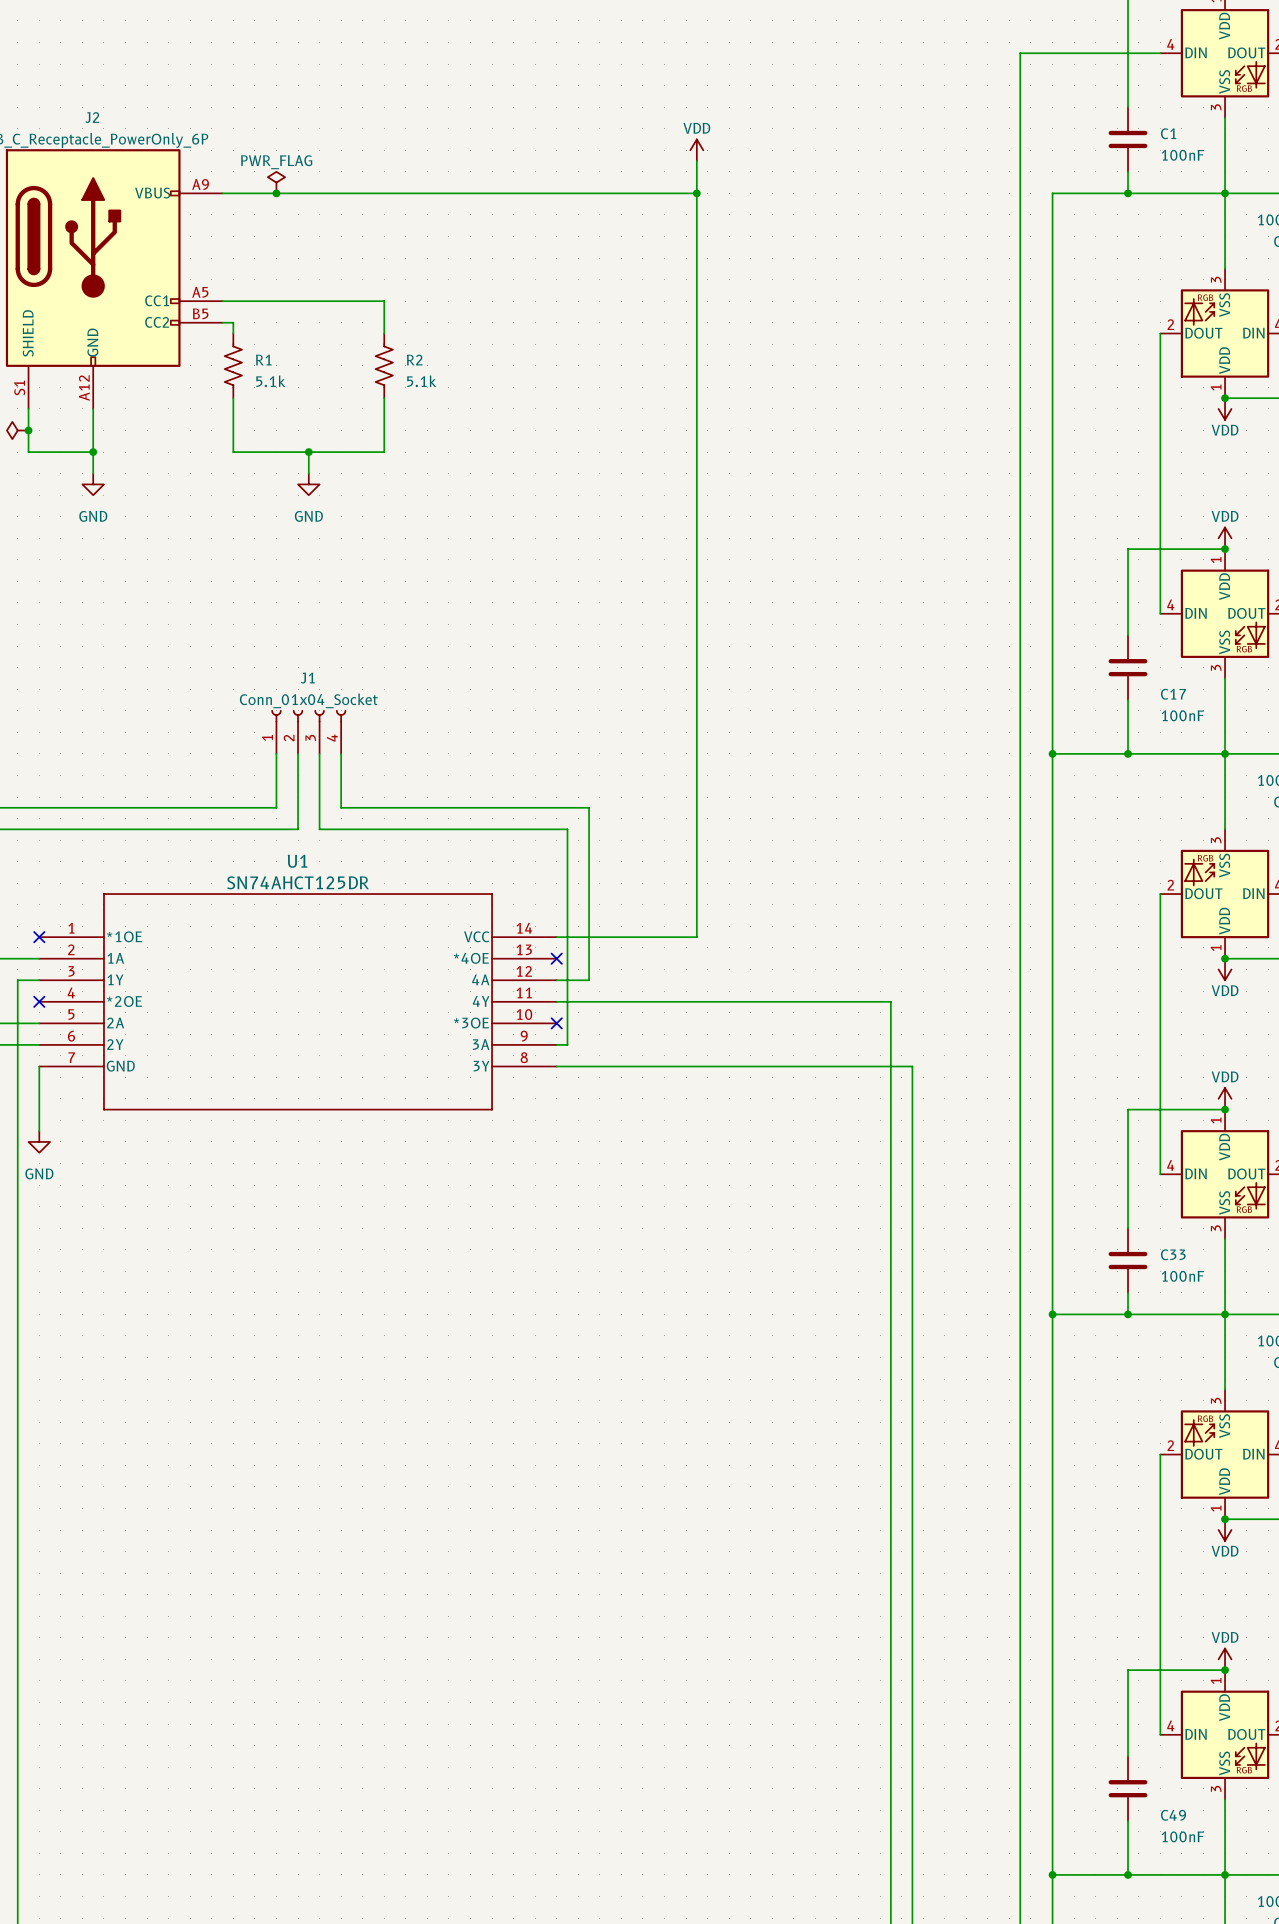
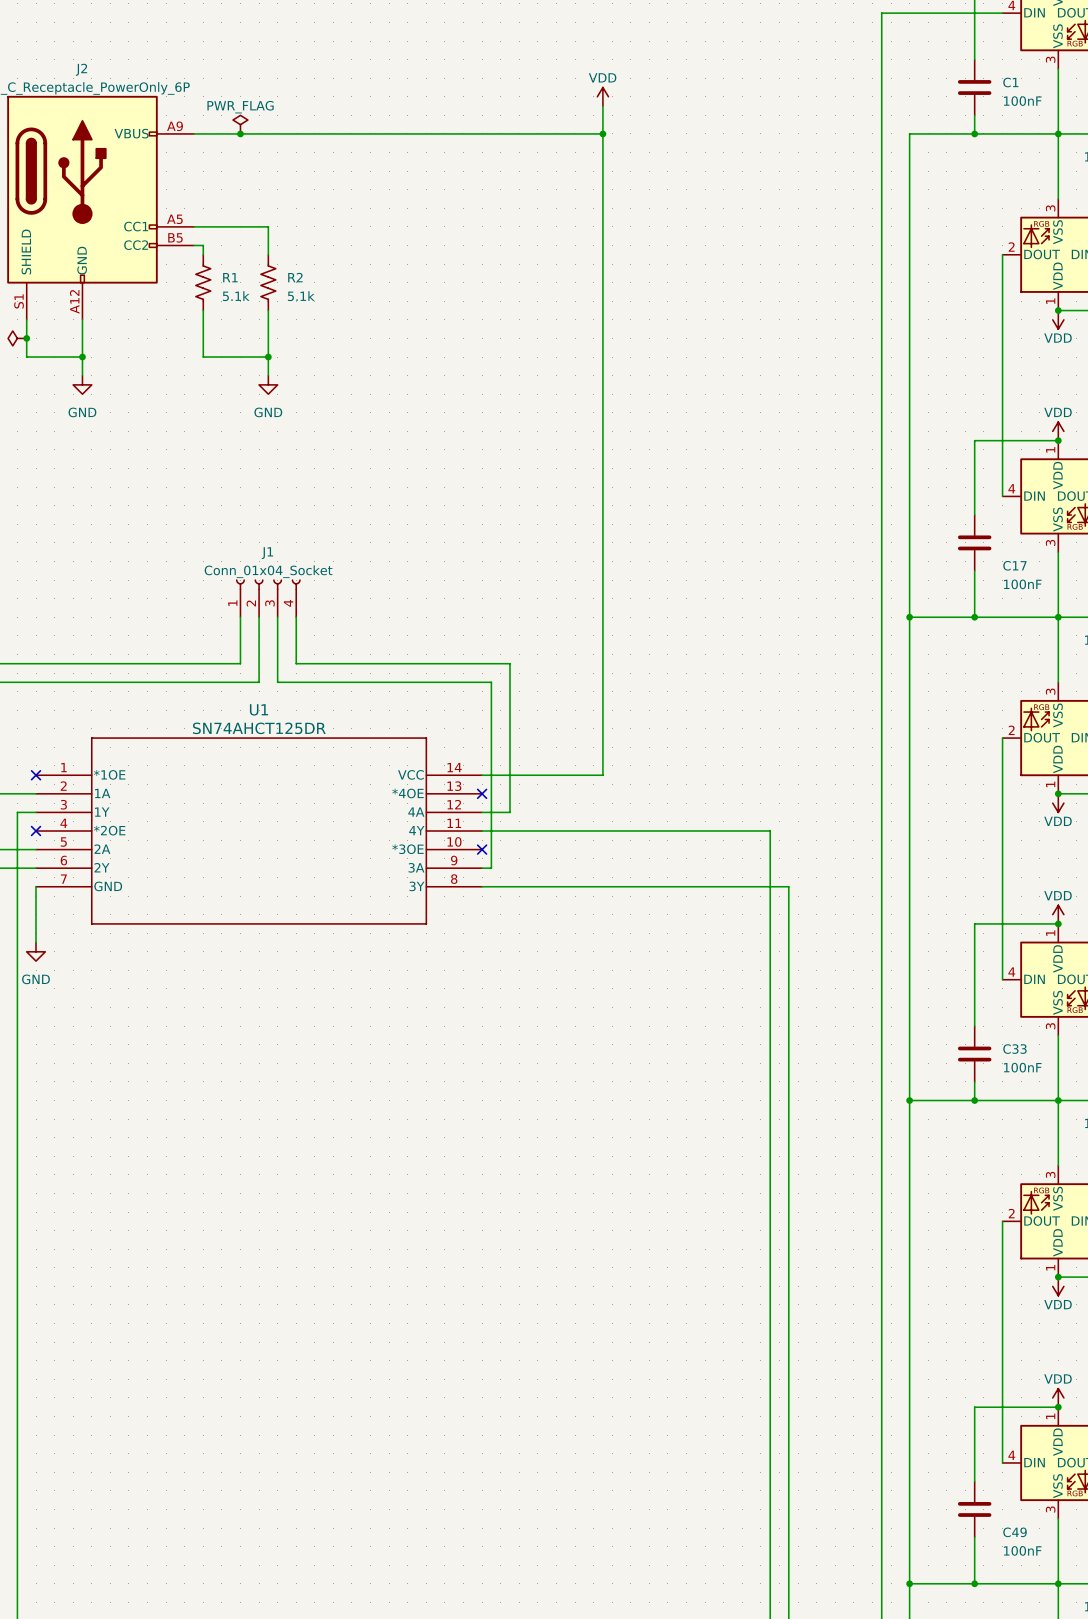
wire: (308, 301) (384, 301) (384, 333) -> (268, 226) (268, 254)
R2 position: (384, 365) -> (268, 282)
wire: (384, 398) (384, 452) (308, 452) -> (268, 310) (268, 357)

